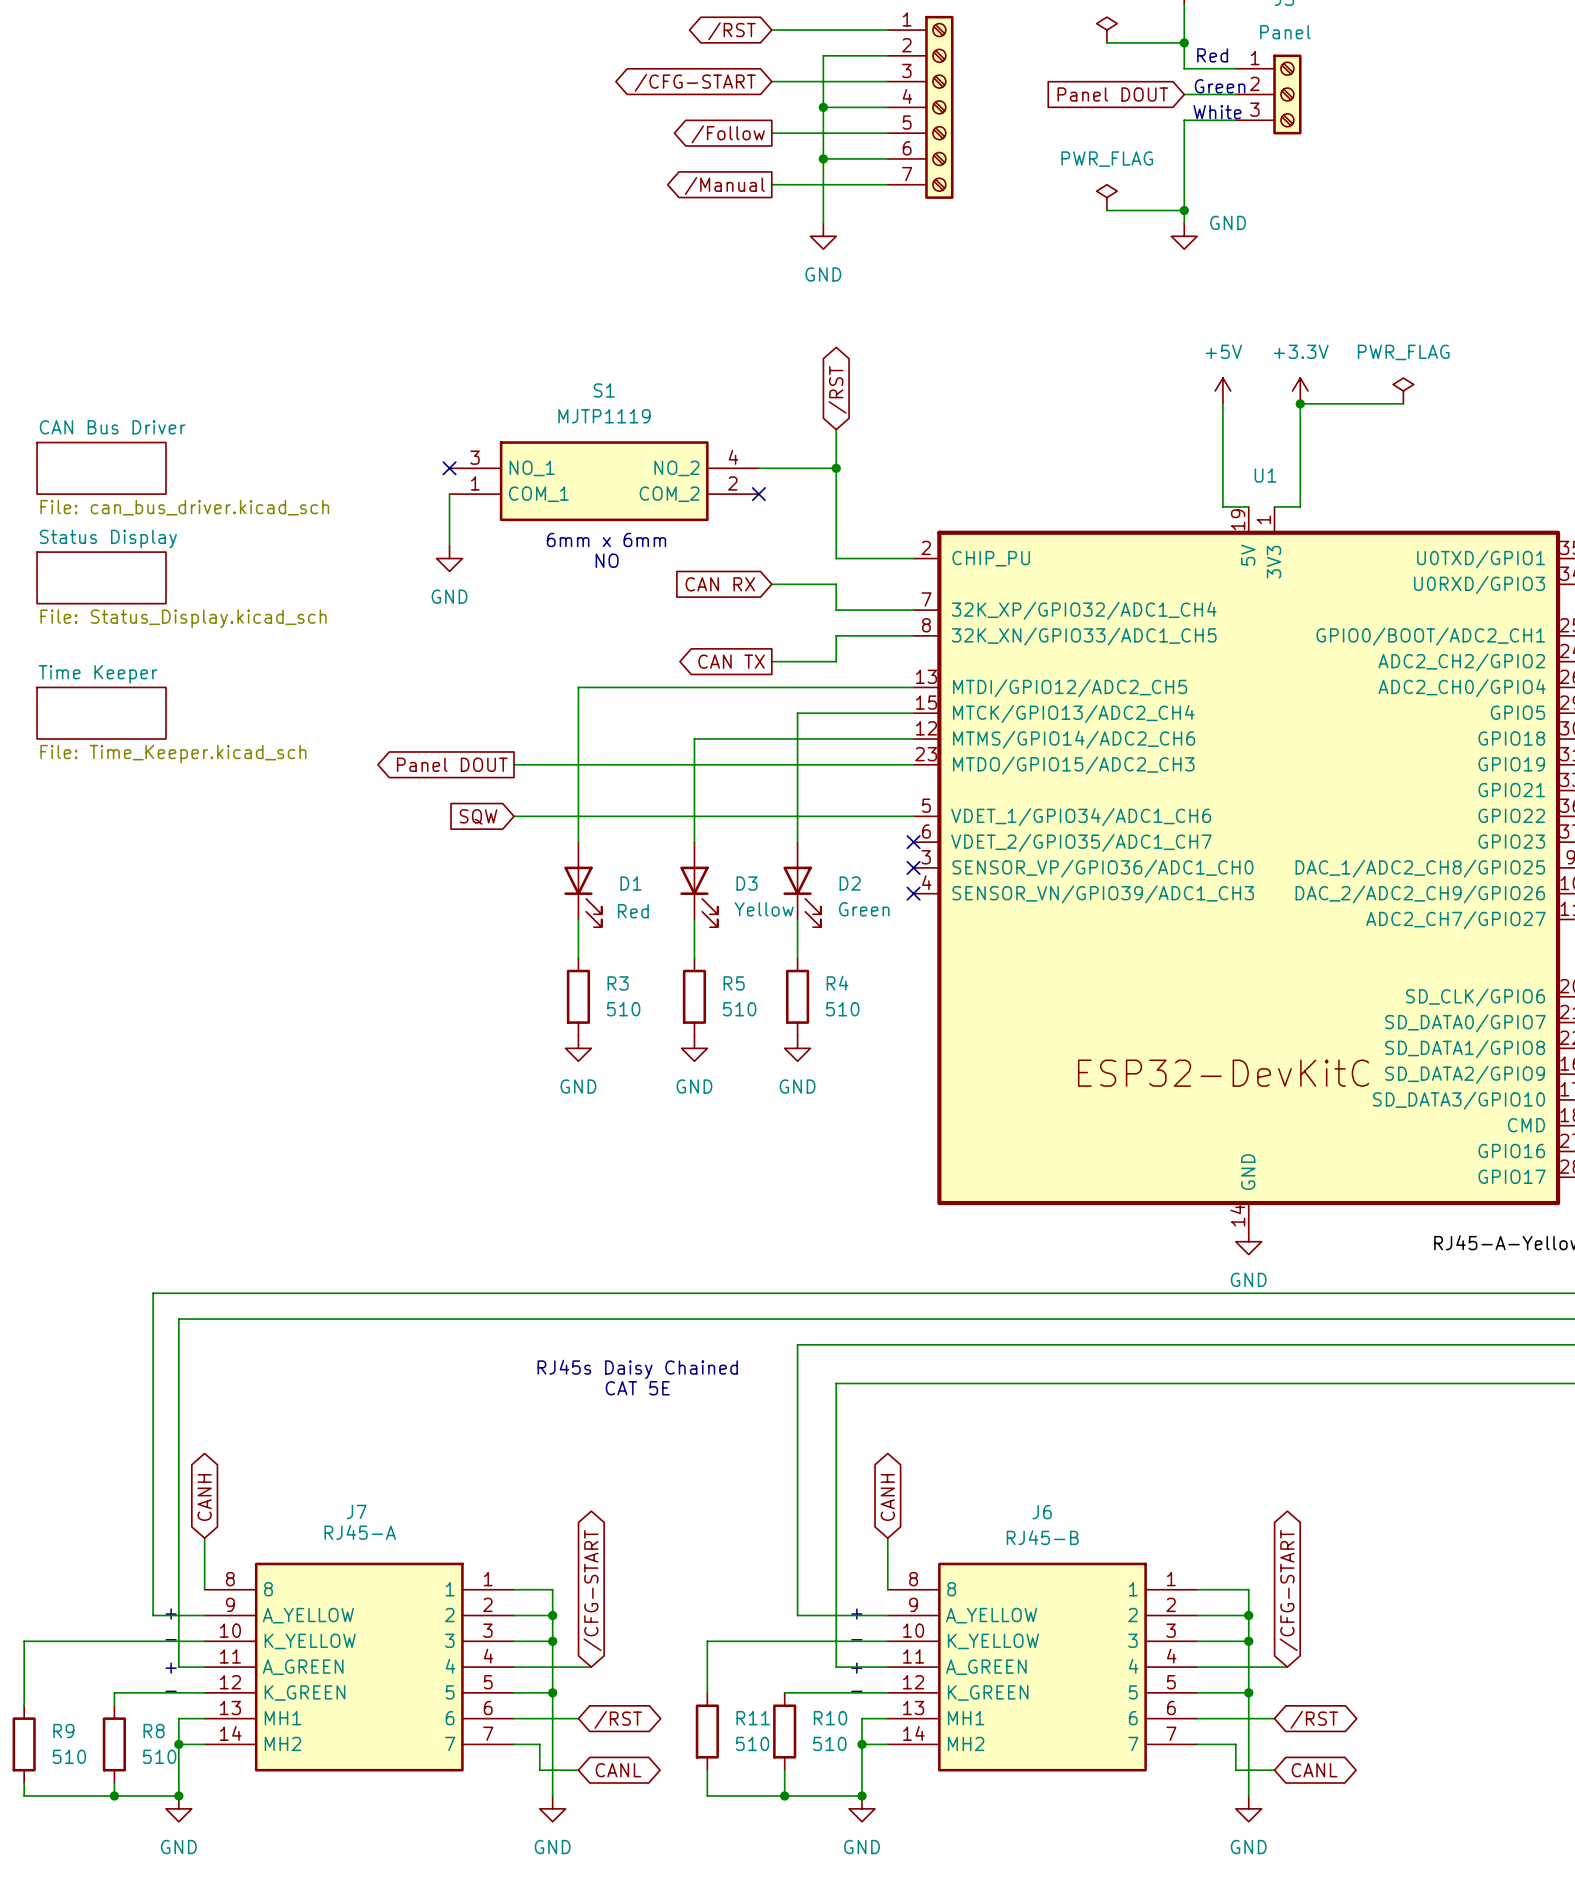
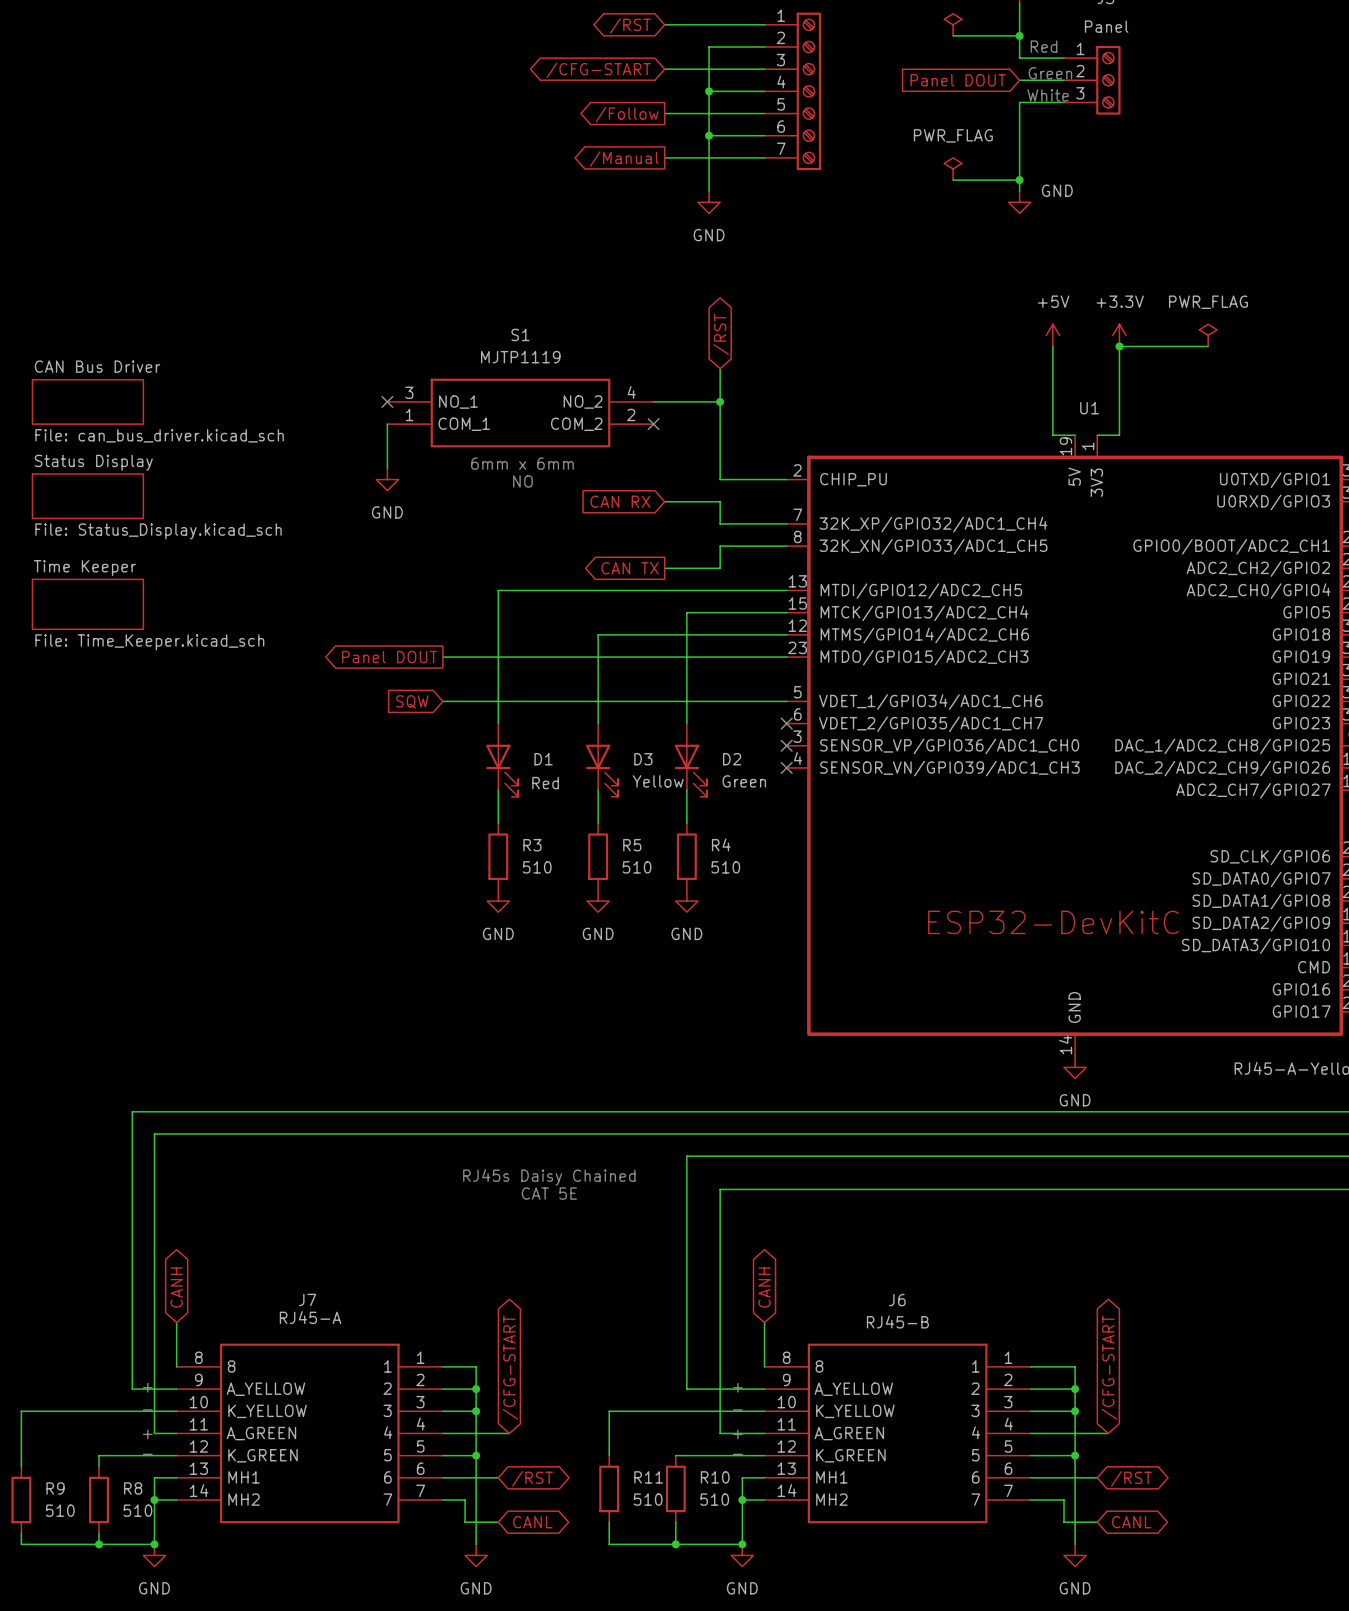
sheet Time Keeper shape: [36, 686, 167, 740] -> [31, 578, 145, 630]

